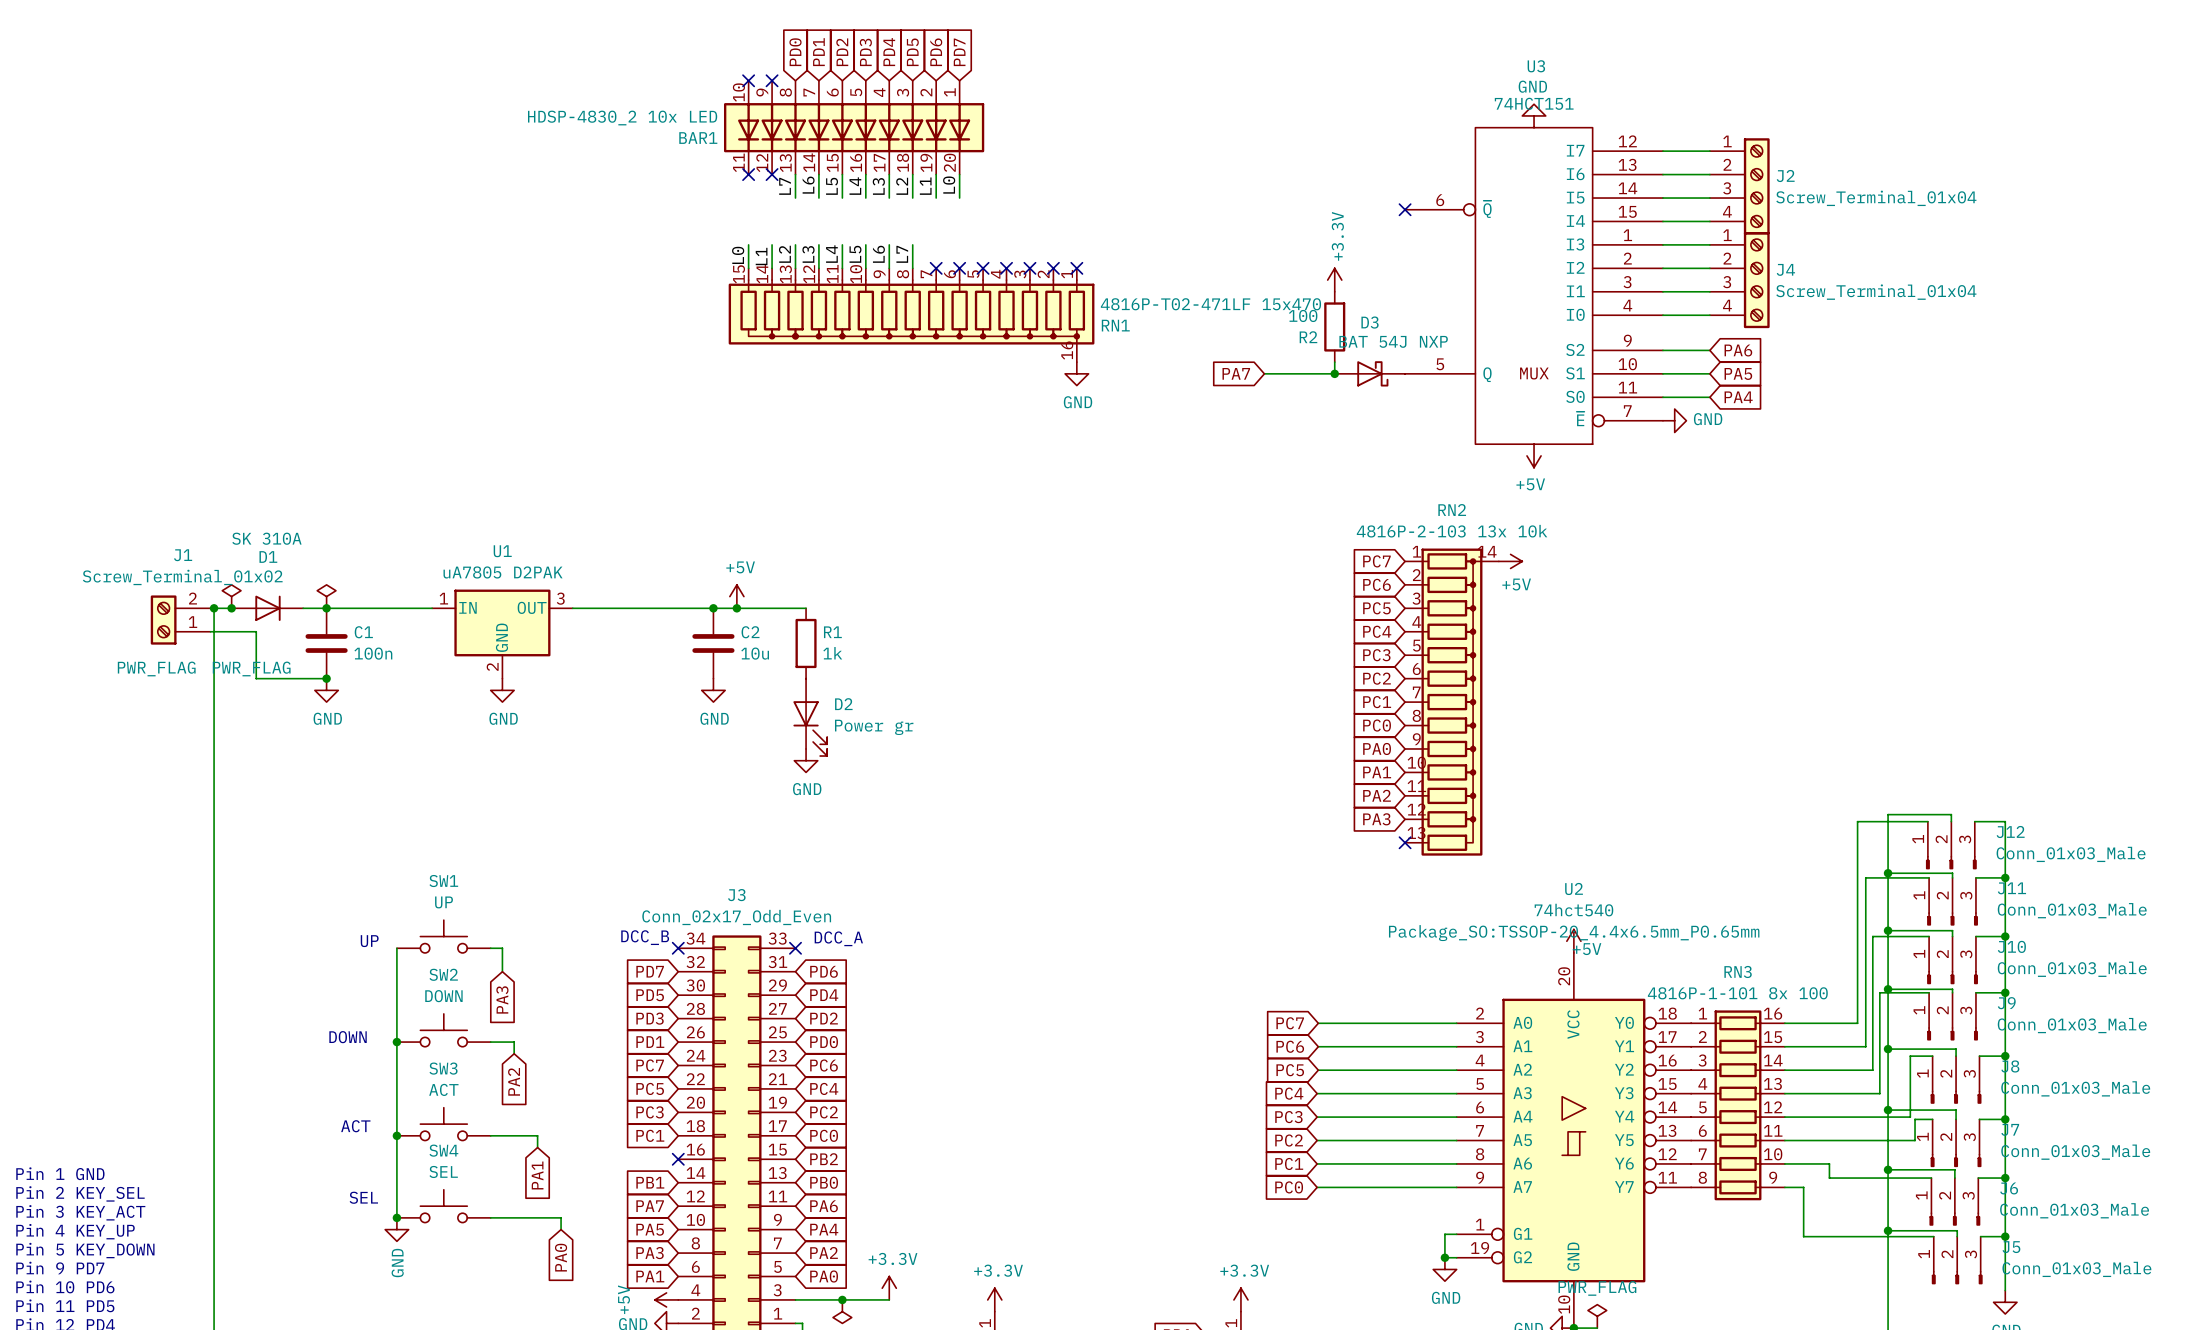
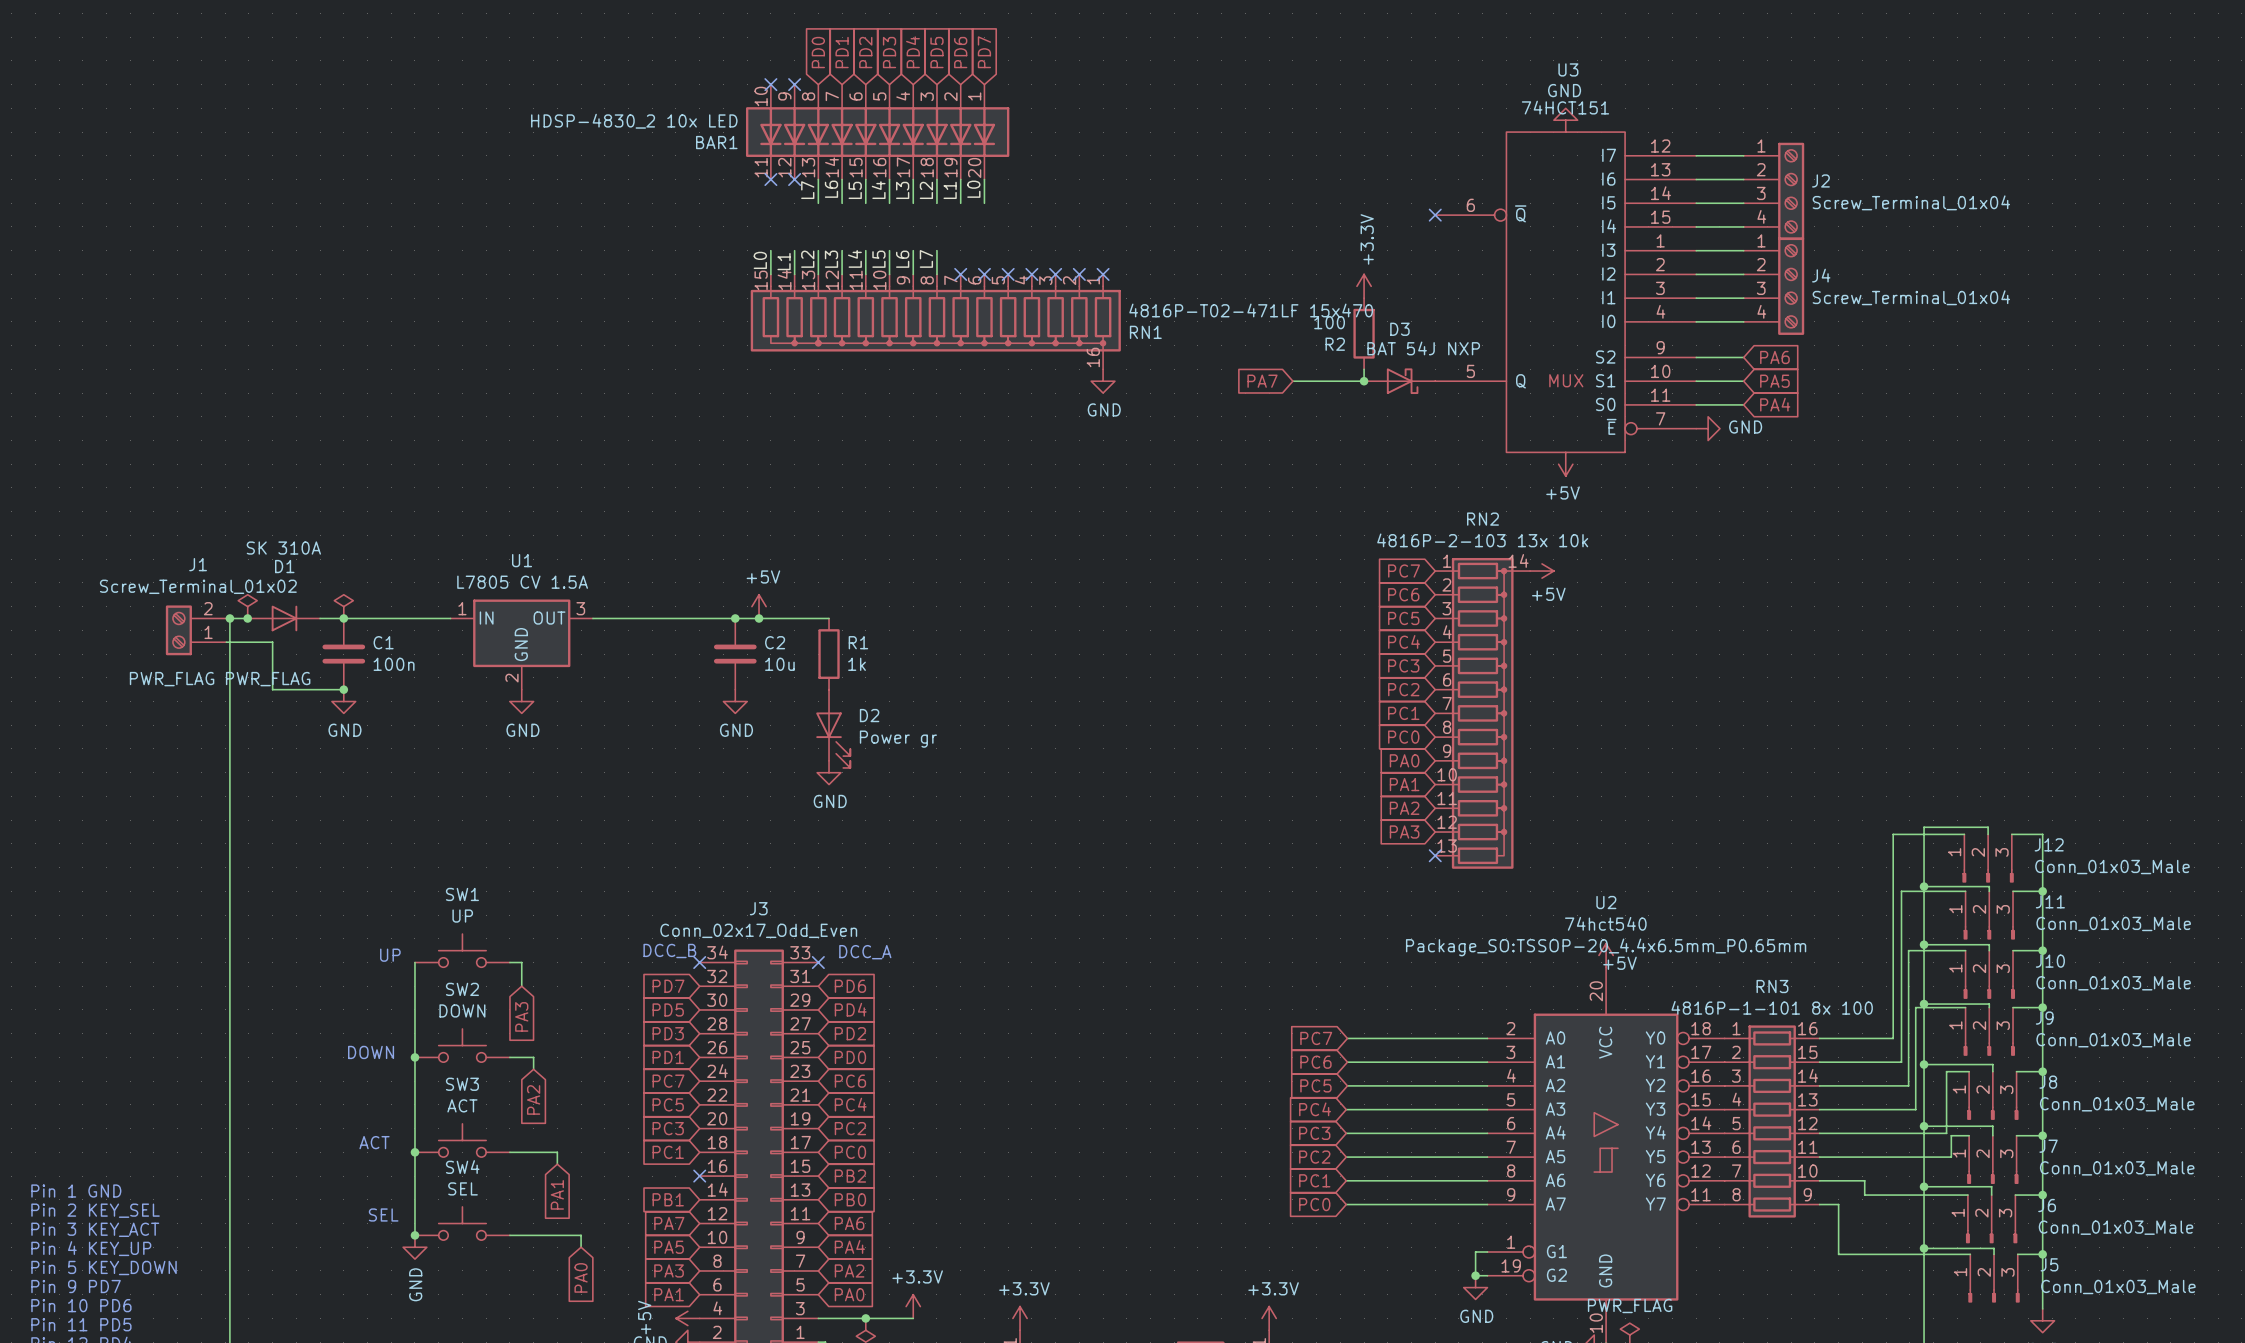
U1 value: uA7805 D2PAK (503, 572) -> L7805 CV 1.5A (522, 582)

